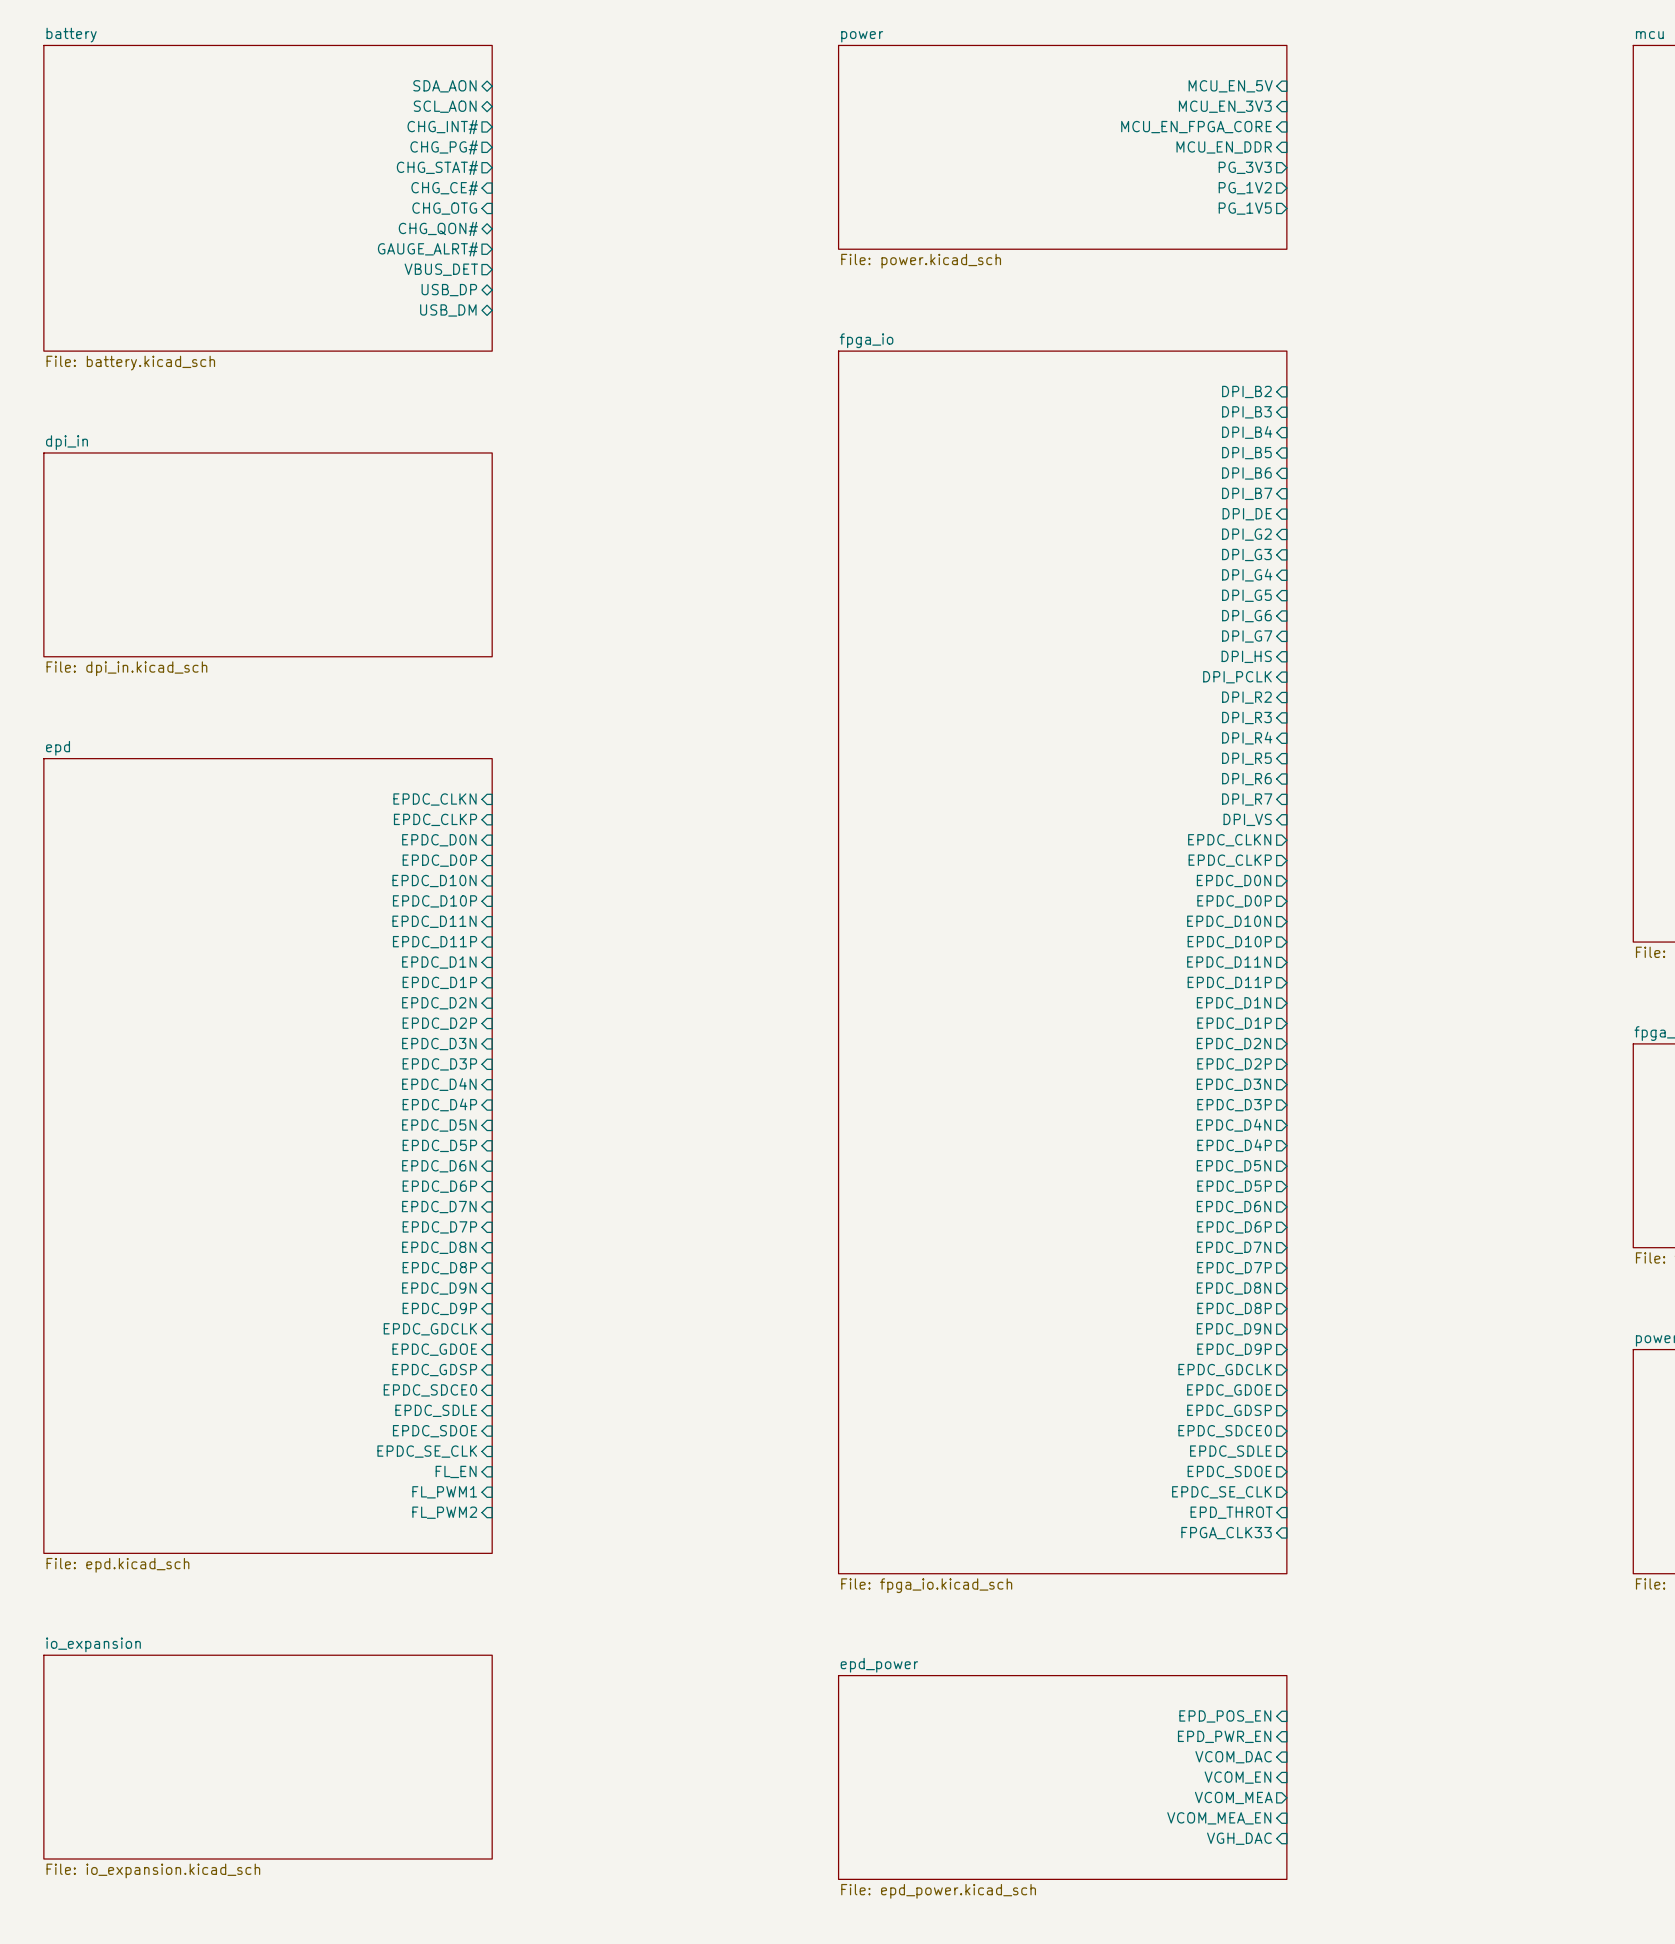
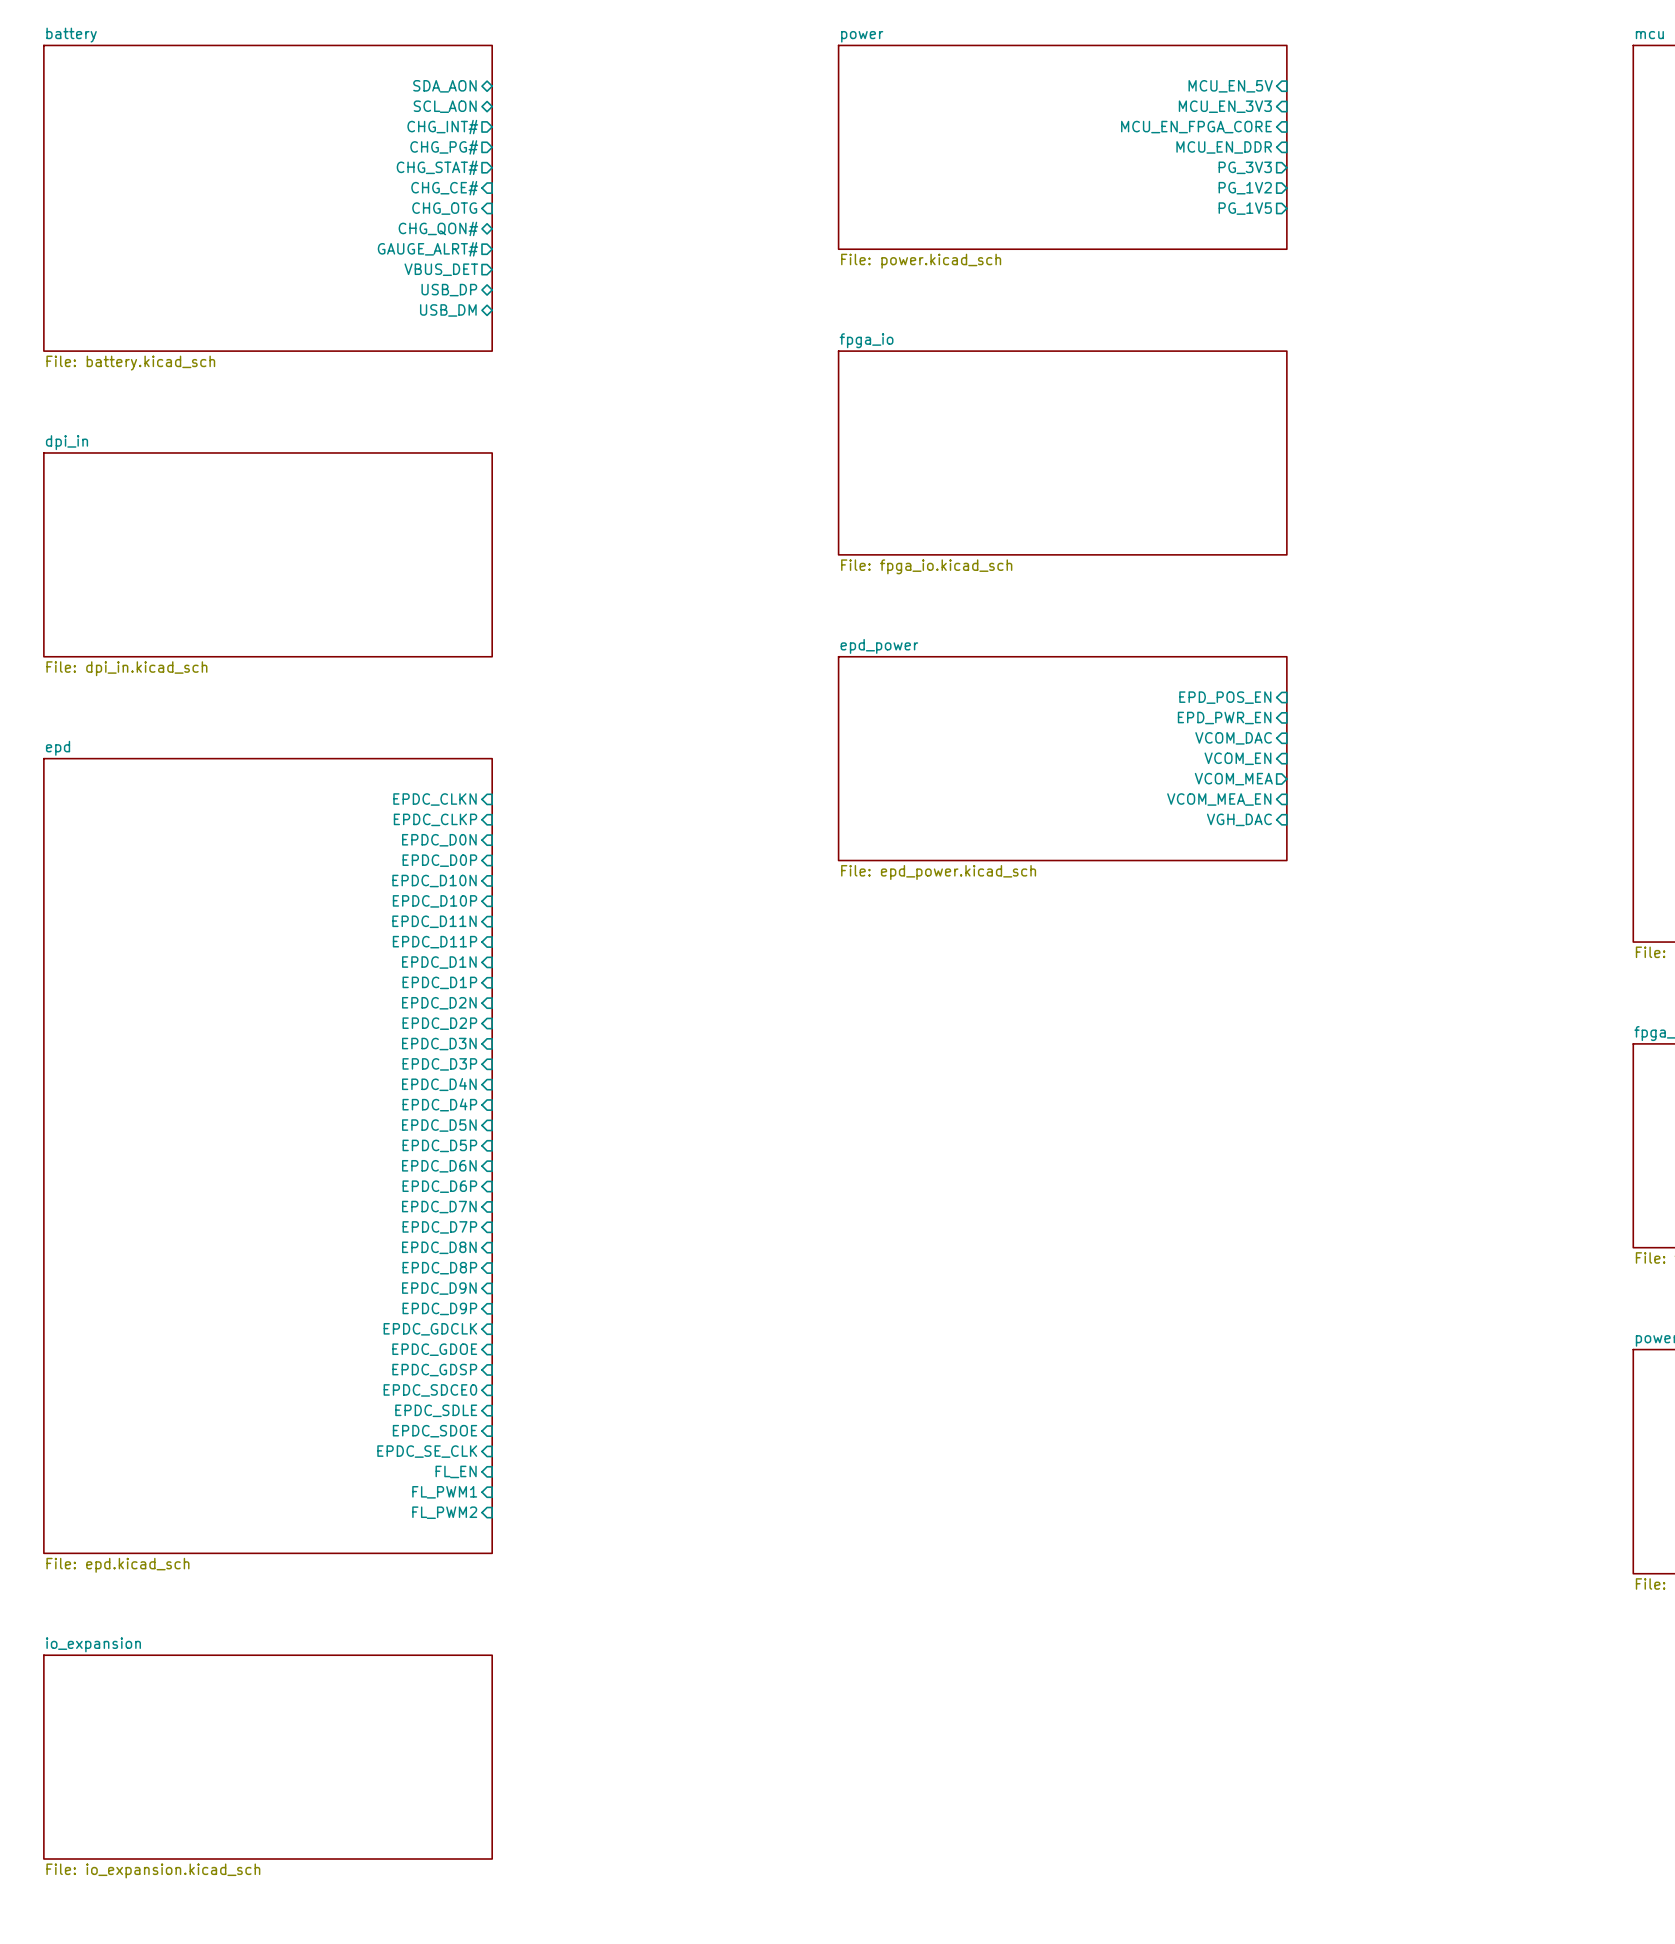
sheet pin: DPI_B2 (1246, 391) -> none
sheet pin: DPI_B3 (1246, 412) -> none
sheet pin: DPI_B4 (1247, 432) -> none
sheet fpga_io: none -> File: fpga_io.kicad_sch (1062, 452)
sheet pin: DPI_B5 (1246, 453) -> none
sheet pin: DPI_B6 (1246, 473) -> none
sheet pin: DPI_B7 (1247, 493) -> none
sheet pin: DPI_DE (1247, 514) -> none
sheet pin: DPI_G2 (1246, 534) -> none
sheet pin: DPI_G3 (1246, 554) -> none
sheet pin: DPI_G4 (1247, 575) -> none
sheet pin: DPI_G5 (1246, 595) -> none
sheet pin: DPI_G6 (1246, 616) -> none
sheet pin: DPI_G7 (1247, 636) -> none
sheet pin: DPI_HS (1246, 656) -> none
sheet pin: DPI_PCLK (1237, 677) -> none
sheet pin: DPI_R2 (1246, 697) -> EPD_POS_EN (1225, 697)
sheet pin: DPI_R3 (1246, 717) -> EPD_PWR_EN (1224, 717)
sheet pin: DPI_R4 (1247, 738) -> VCOM_DAC (1233, 738)
sheet epd_power: none -> File: epd_power.kicad_sch (1062, 758)
sheet pin: DPI_R5 (1246, 758) -> VCOM_EN (1237, 758)
sheet pin shape: input (1246, 779) -> output (1233, 779)
sheet pin: DPI_R6 (1246, 779) -> VCOM_MEA (1233, 779)
sheet pin: DPI_R7 (1247, 799) -> VCOM_MEA_EN (1219, 799)
sheet pin: DPI_VS (1247, 819) -> VGH_DAC (1239, 819)
sheet pin: EPDC_CLKN (1229, 840) -> none
sheet pin: EPDC_CLKP (1230, 860) -> none
sheet pin: EPDC_D0N (1234, 881) -> none
sheet pin: EPDC_D0P (1234, 901) -> none
sheet pin: EPDC_D10N (1229, 921) -> none
sheet pin: EPDC_D10P (1229, 942) -> none
sheet fpga_io: File: fpga_io.kicad_sch (1062, 962) -> none
sheet pin: EPDC_D11N (1229, 962) -> none
sheet pin: EPDC_D11P (1229, 982) -> none
sheet pin: EPDC_D1N (1234, 1003) -> none
sheet pin: EPDC_D1P (1234, 1023) -> none
sheet pin: EPDC_D2N (1234, 1044) -> none
sheet pin: EPDC_D2P (1234, 1064) -> none
sheet pin: EPDC_D3N (1234, 1084) -> none
sheet pin: EPDC_D3P (1234, 1105) -> none
sheet pin: EPDC_D4N (1234, 1125) -> none
sheet pin: EPDC_D4P (1234, 1145) -> none
sheet pin: EPDC_D5N (1234, 1166) -> none
sheet pin: EPDC_D5P (1234, 1186) -> none
sheet pin: EPDC_D6N (1234, 1207) -> none
sheet pin: EPDC_D6P (1234, 1227) -> none
sheet pin: EPDC_D7N (1234, 1247) -> none
sheet pin: EPDC_D7P (1234, 1268) -> none
sheet pin: EPDC_D8N (1234, 1288) -> none
sheet pin: EPDC_D8P (1234, 1308) -> none
sheet pin: EPDC_D9N (1234, 1329) -> none
sheet pin: EPDC_D9P (1234, 1349) -> none
sheet pin: EPDC_GDCLK (1225, 1370) -> none
sheet pin: EPDC_GDOE (1229, 1390) -> none
sheet pin: EPDC_GDSP (1229, 1410) -> none
sheet pin: EPDC_SDCE0 (1225, 1431) -> none
sheet pin: EPDC_SDLE (1230, 1451) -> none
sheet pin: EPDC_SDOE (1229, 1471) -> none
sheet pin: EPDC_SE_CLK (1221, 1492) -> none
sheet pin: EPD_THROT (1231, 1512) -> none
sheet pin: FPGA_CLK33 (1226, 1533) -> none
sheet pin: EPD_POS_EN (1225, 1716) -> none
sheet pin: EPD_PWR_EN (1224, 1736) -> none
sheet pin: VCOM_DAC (1233, 1757) -> none
sheet epd_power: File: epd_power.kicad_sch (1062, 1777) -> none
sheet pin: VCOM_EN (1237, 1777) -> none
sheet pin: VCOM_MEA (1233, 1797) -> none
sheet pin: VCOM_MEA_EN (1219, 1818) -> none
sheet pin: VGH_DAC (1239, 1838) -> none

